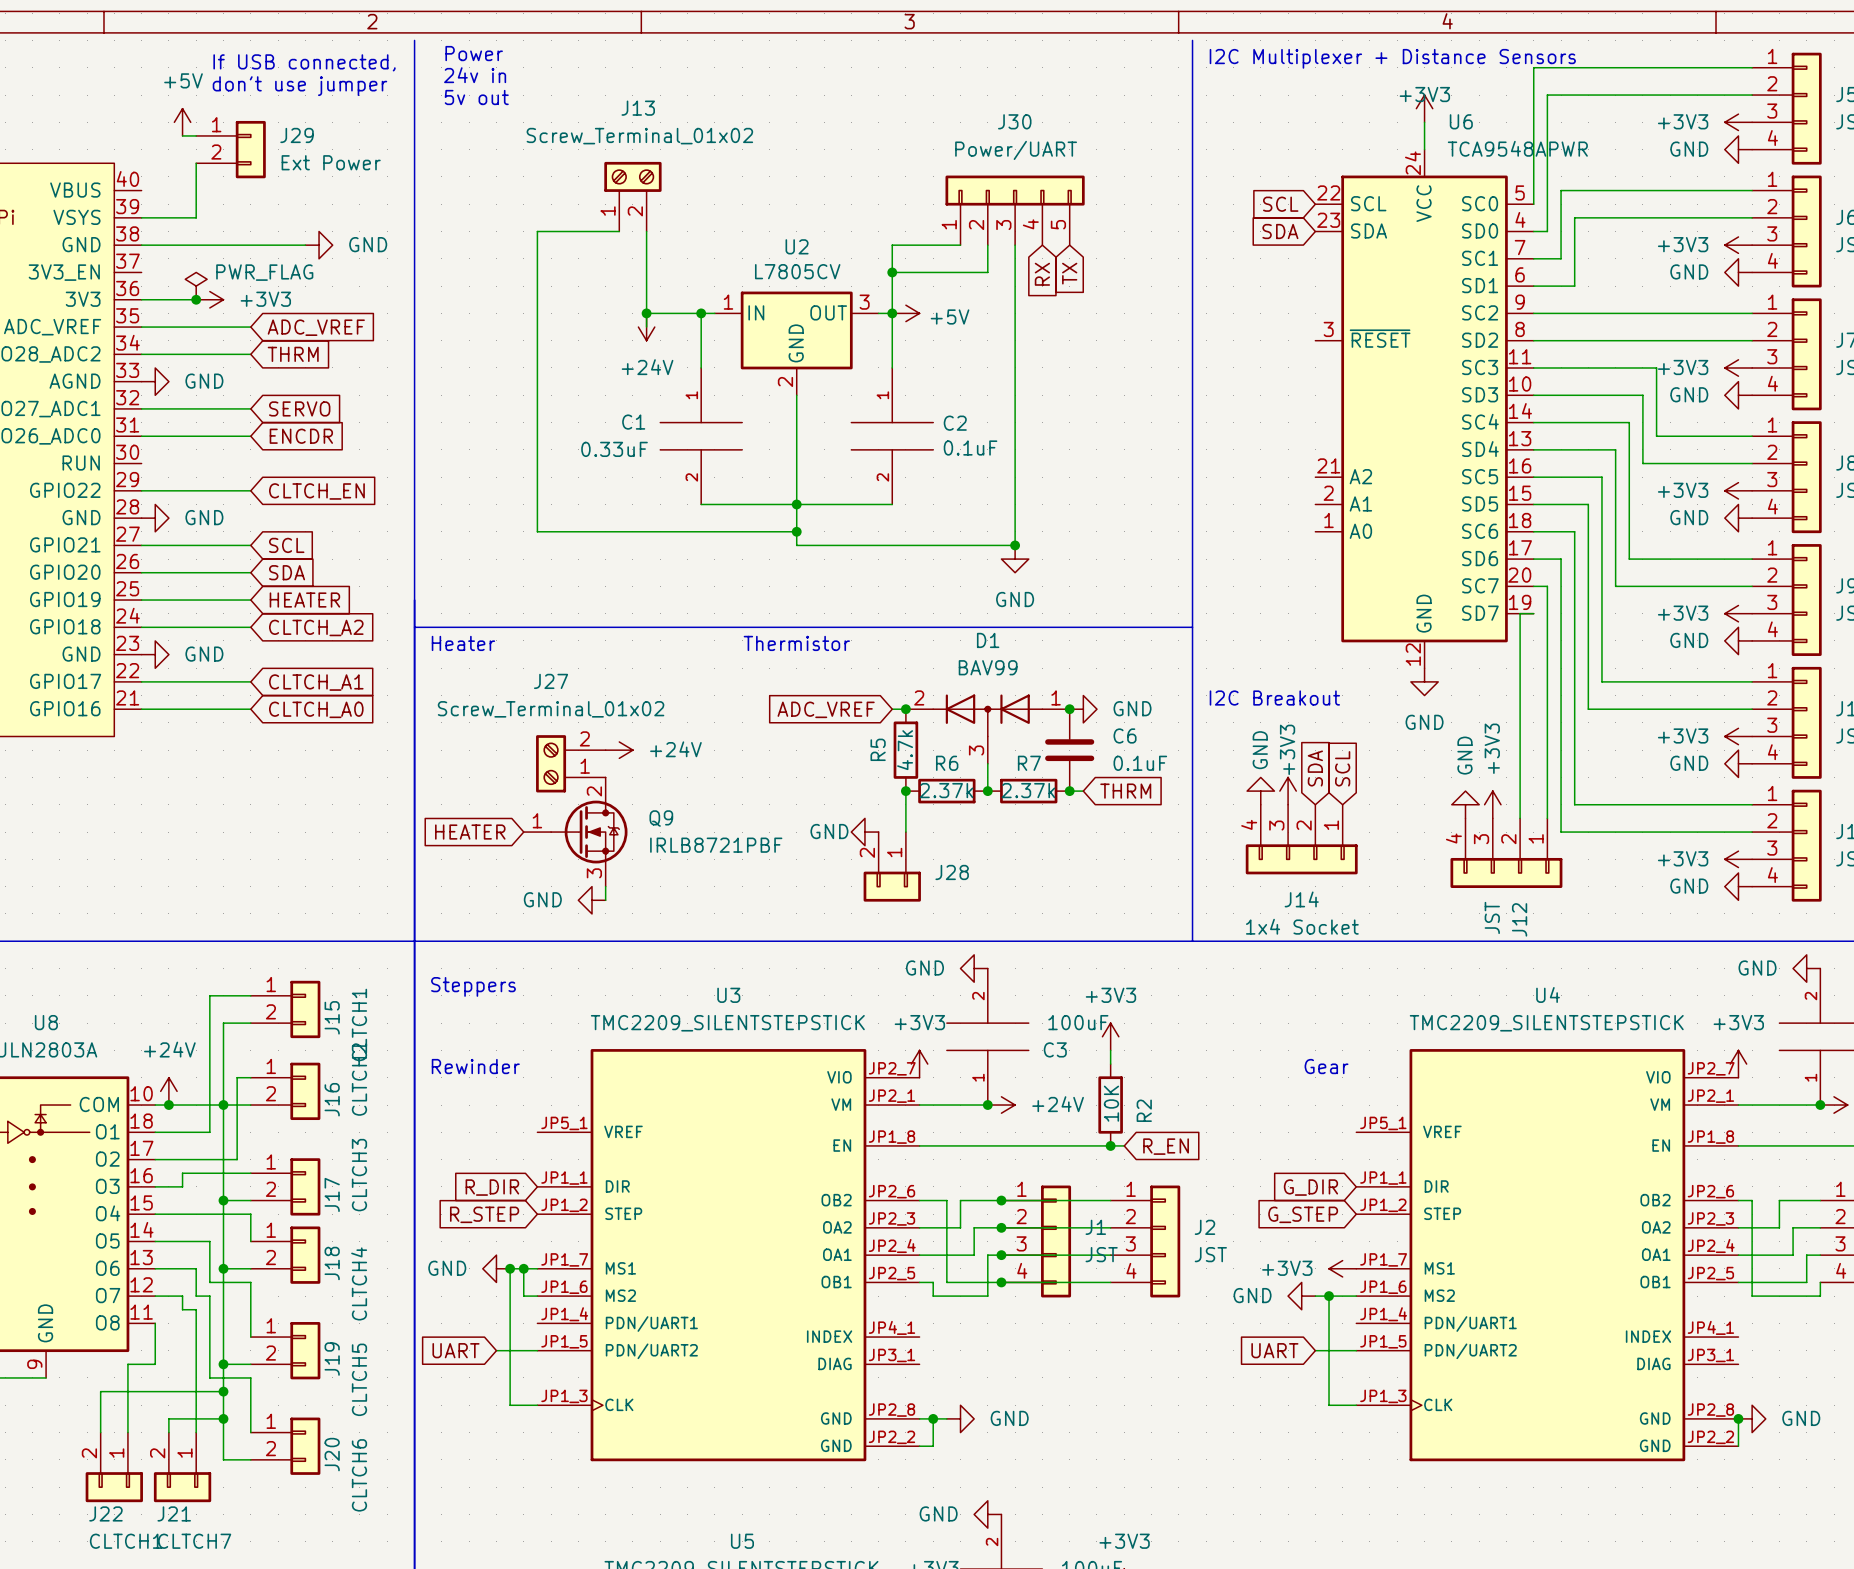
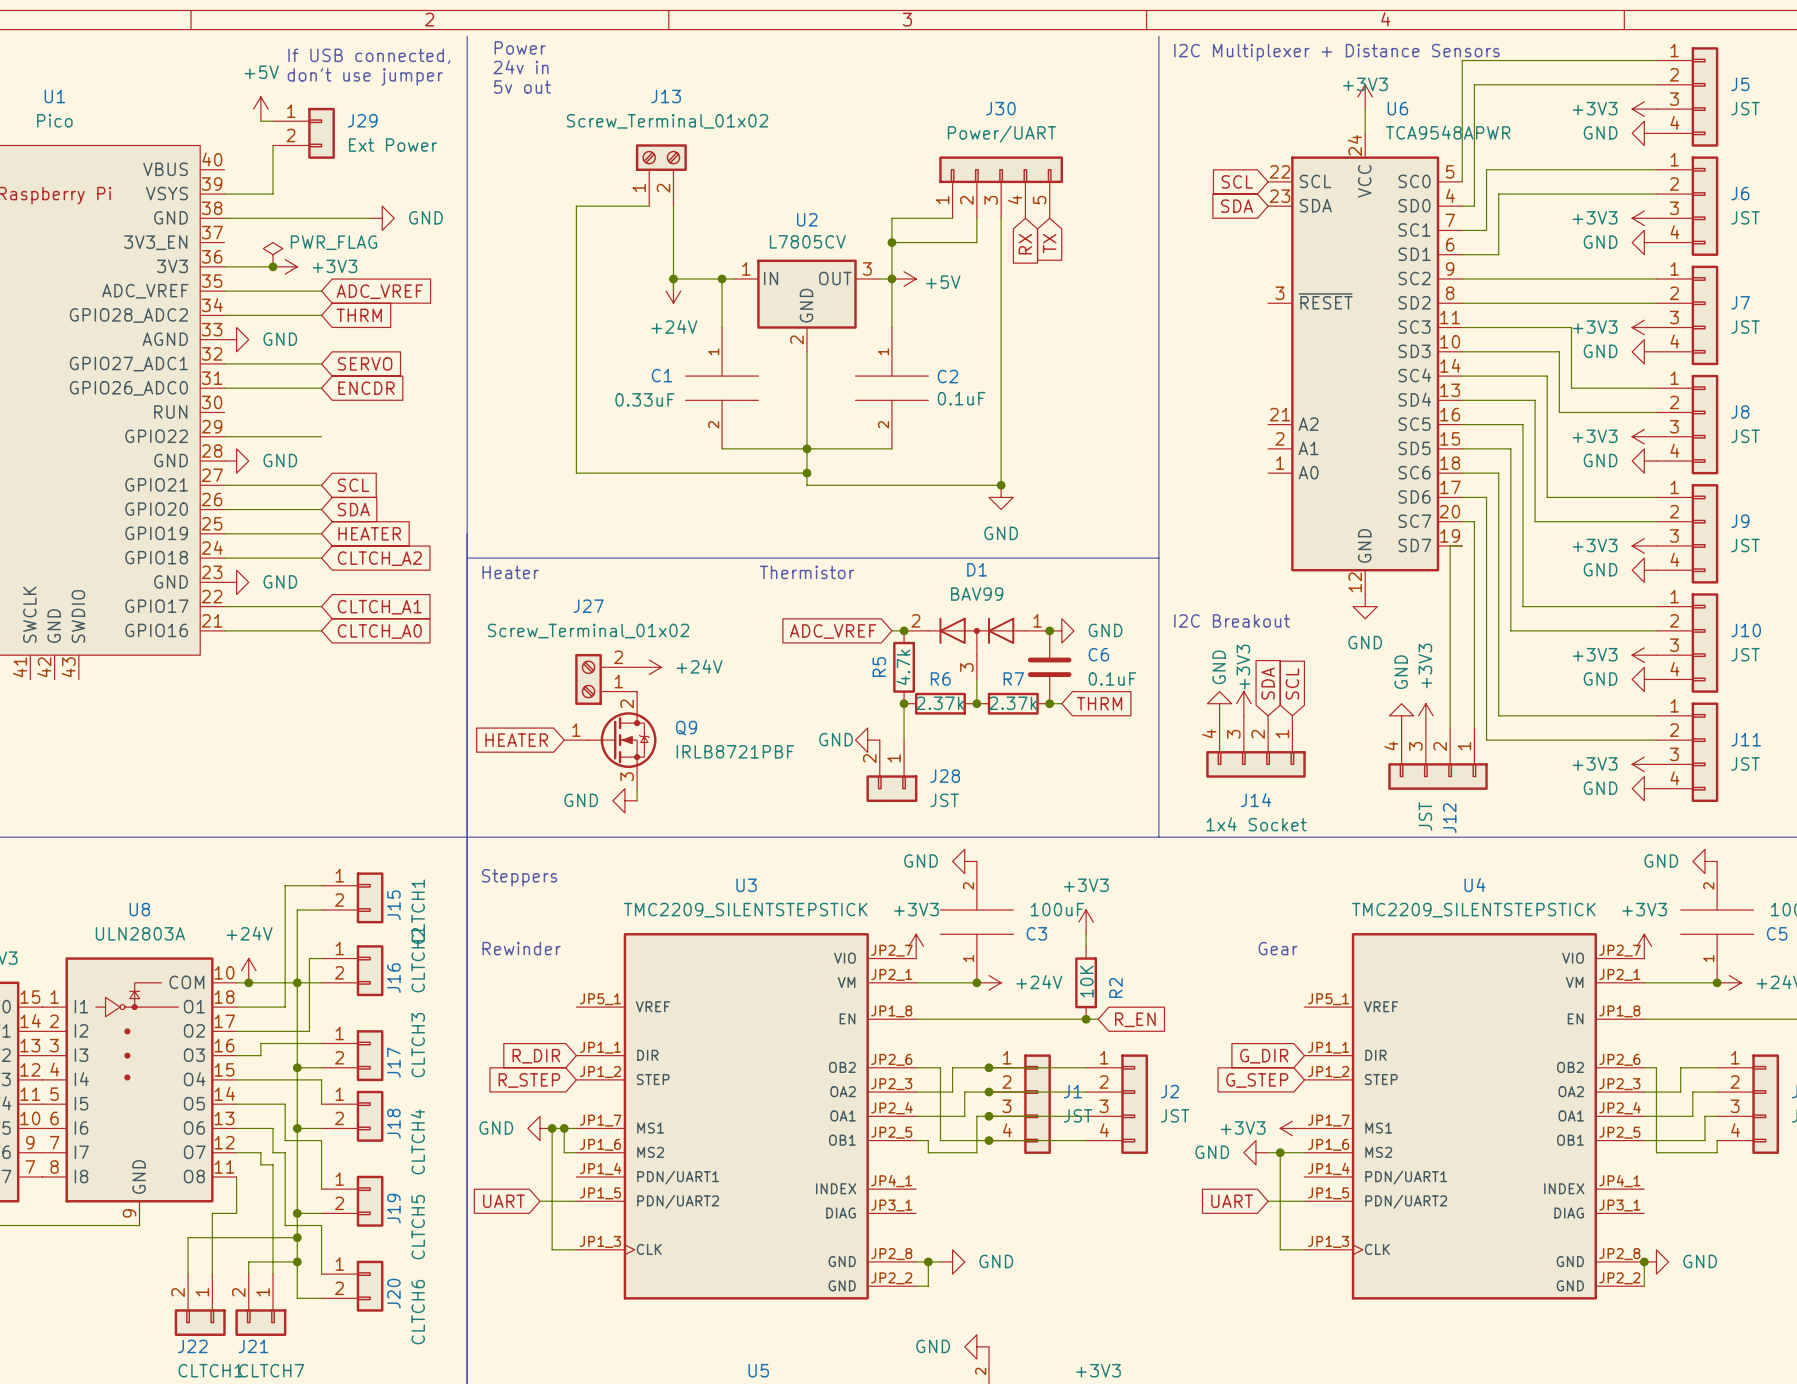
global label: CLTCH_EN (316, 491) -> none
J28 value: none -> JST (944, 800)

